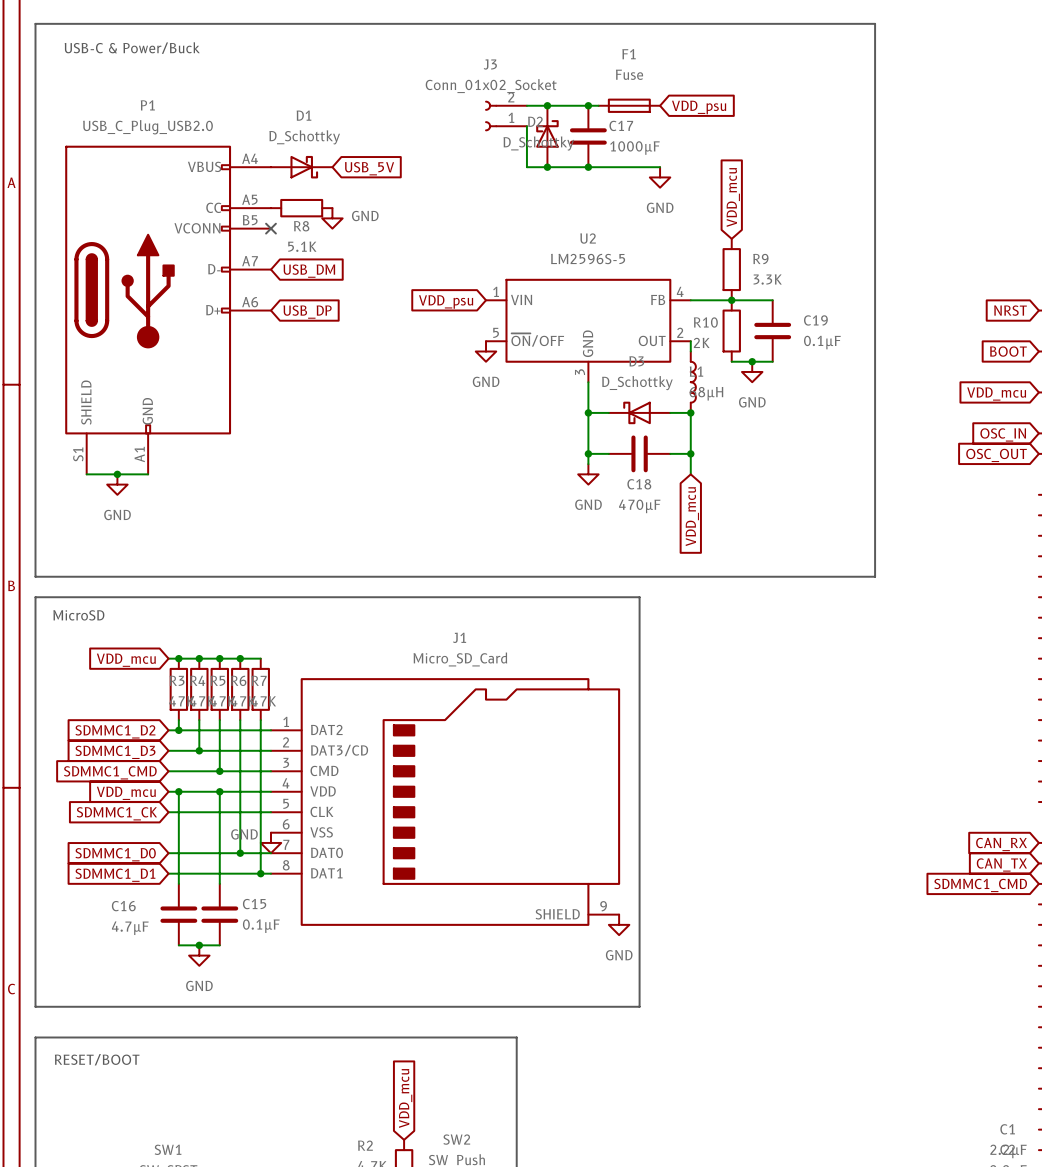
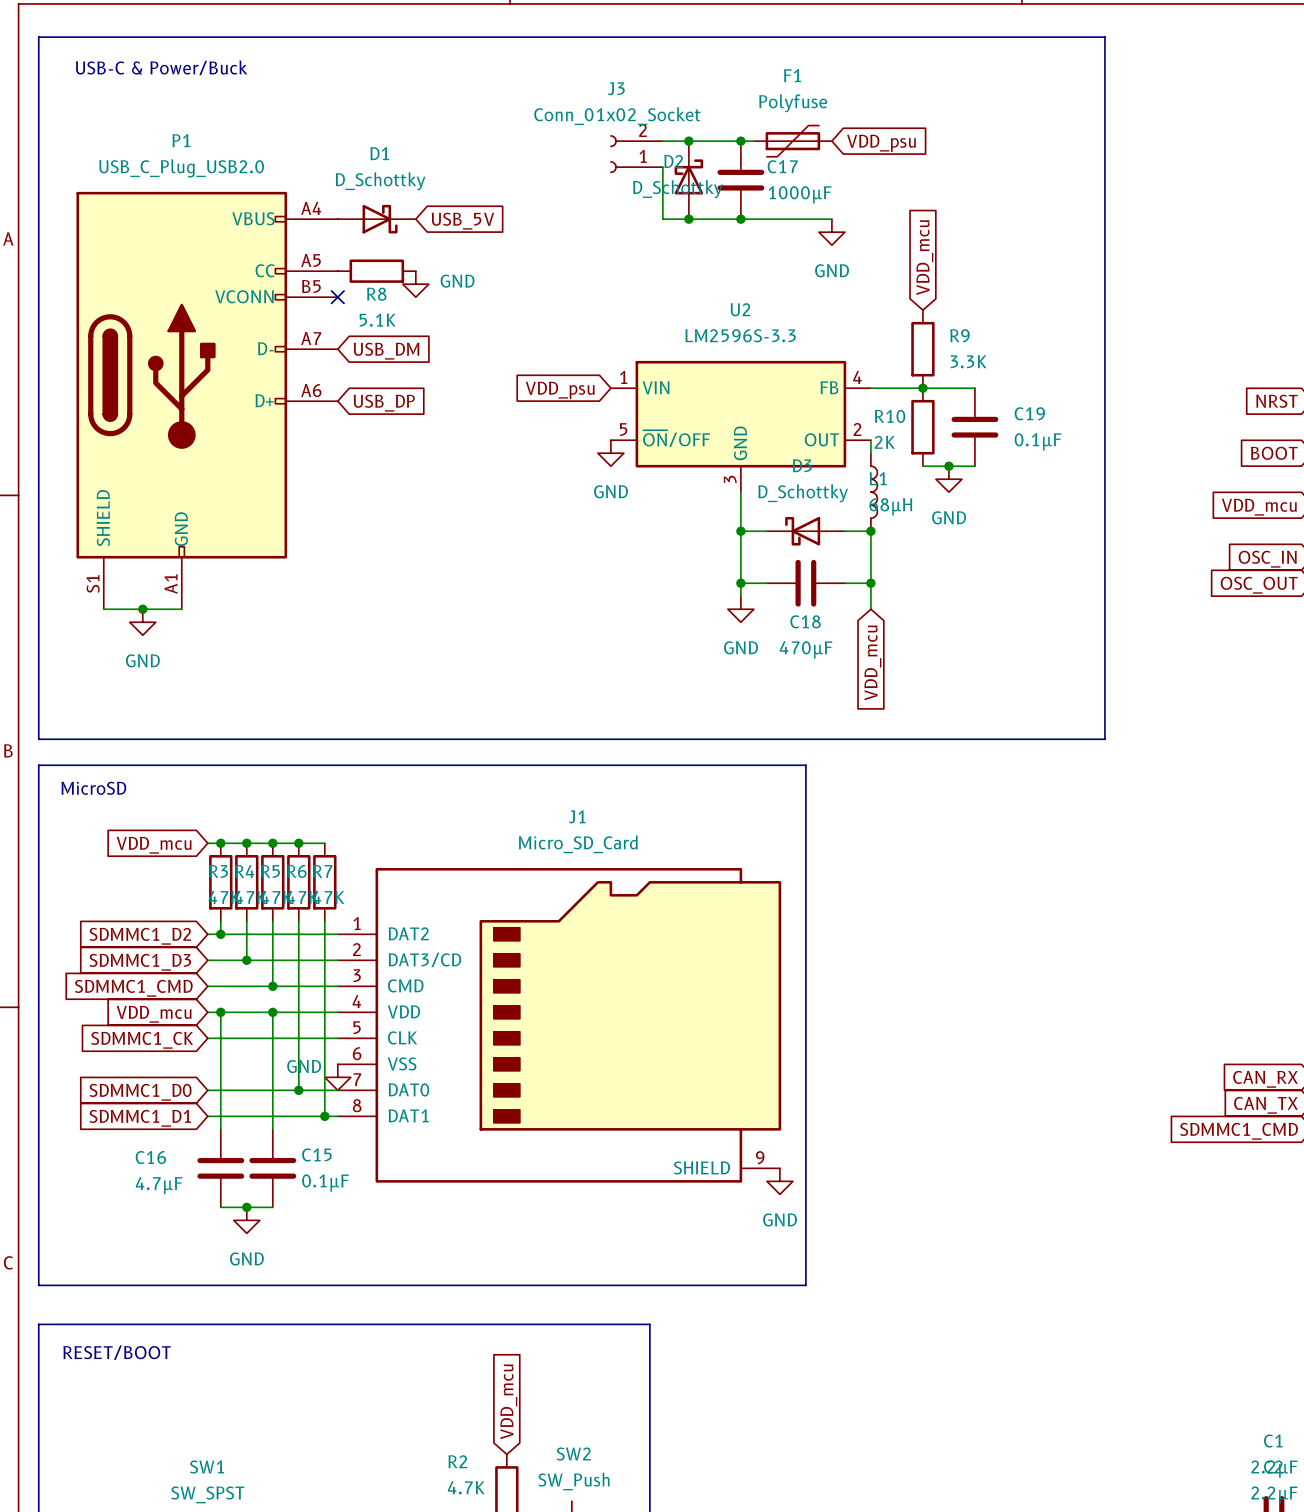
F1 value: Fuse (629, 74) -> Polyfuse (793, 103)
F1 symbol: [598, 98, 661, 113] -> [753, 125, 832, 157]
U2 value: LM2596S-5 (588, 259) -> LM2596S-3.3 (740, 335)

